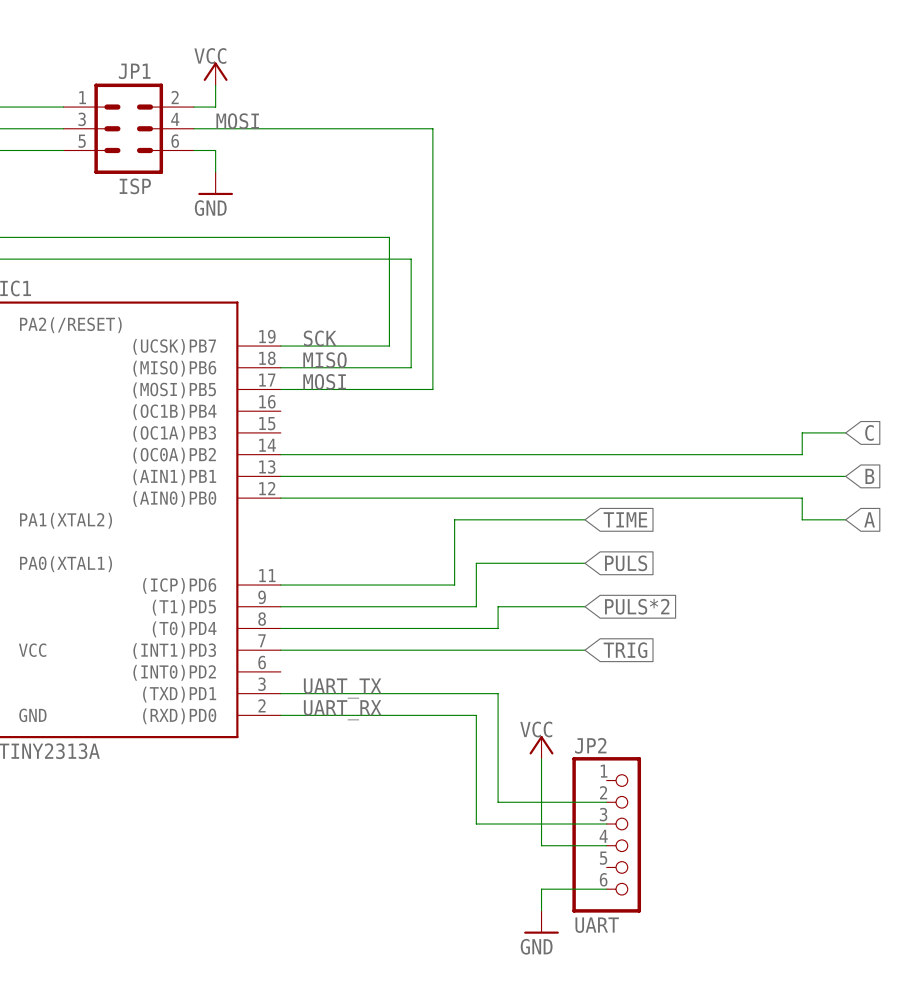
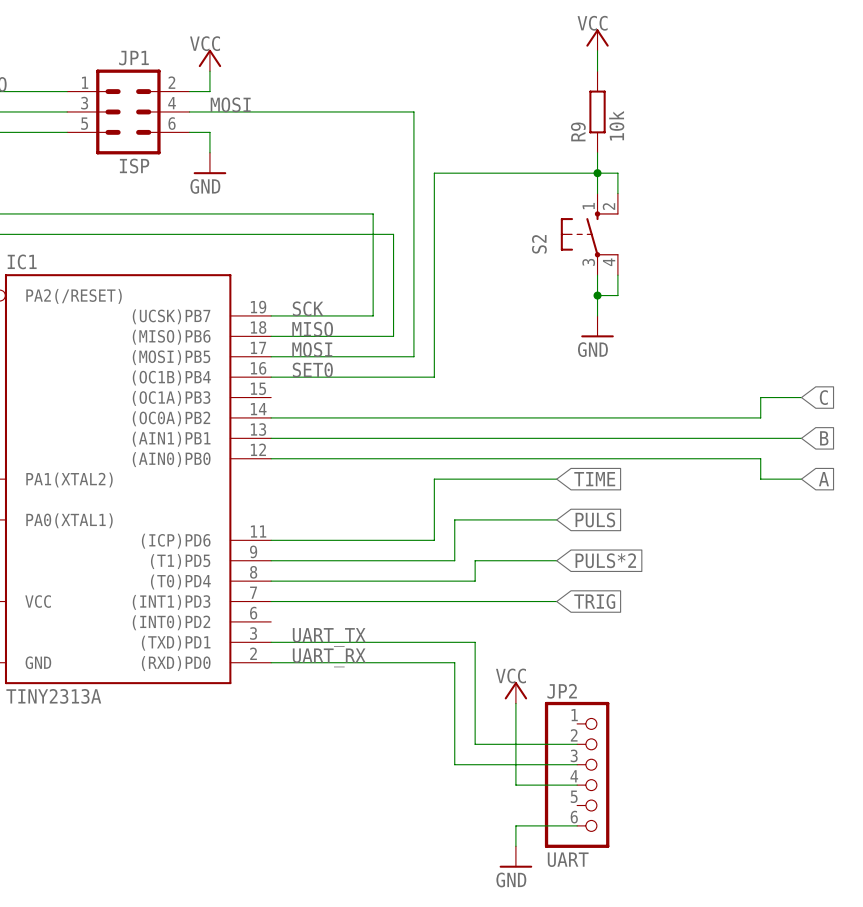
power symbol: none -> VCC (597, 40)
wire: none -> (597, 50) (597, 71)
R9: none -> 10k (597, 111)
wire: none -> (597, 152) (597, 193)
junction: none -> (597, 173)
wire: none -> (617, 193) (617, 173) (434, 173) (434, 377) (271, 377)
S2: none -> (589, 234)
wire: none -> (597, 275) (597, 315)
wire: none -> (617, 275) (617, 295) (597, 295)
junction: none -> (597, 295)
power symbol: none -> GND (597, 326)
label: none -> SET0 (312, 370)

